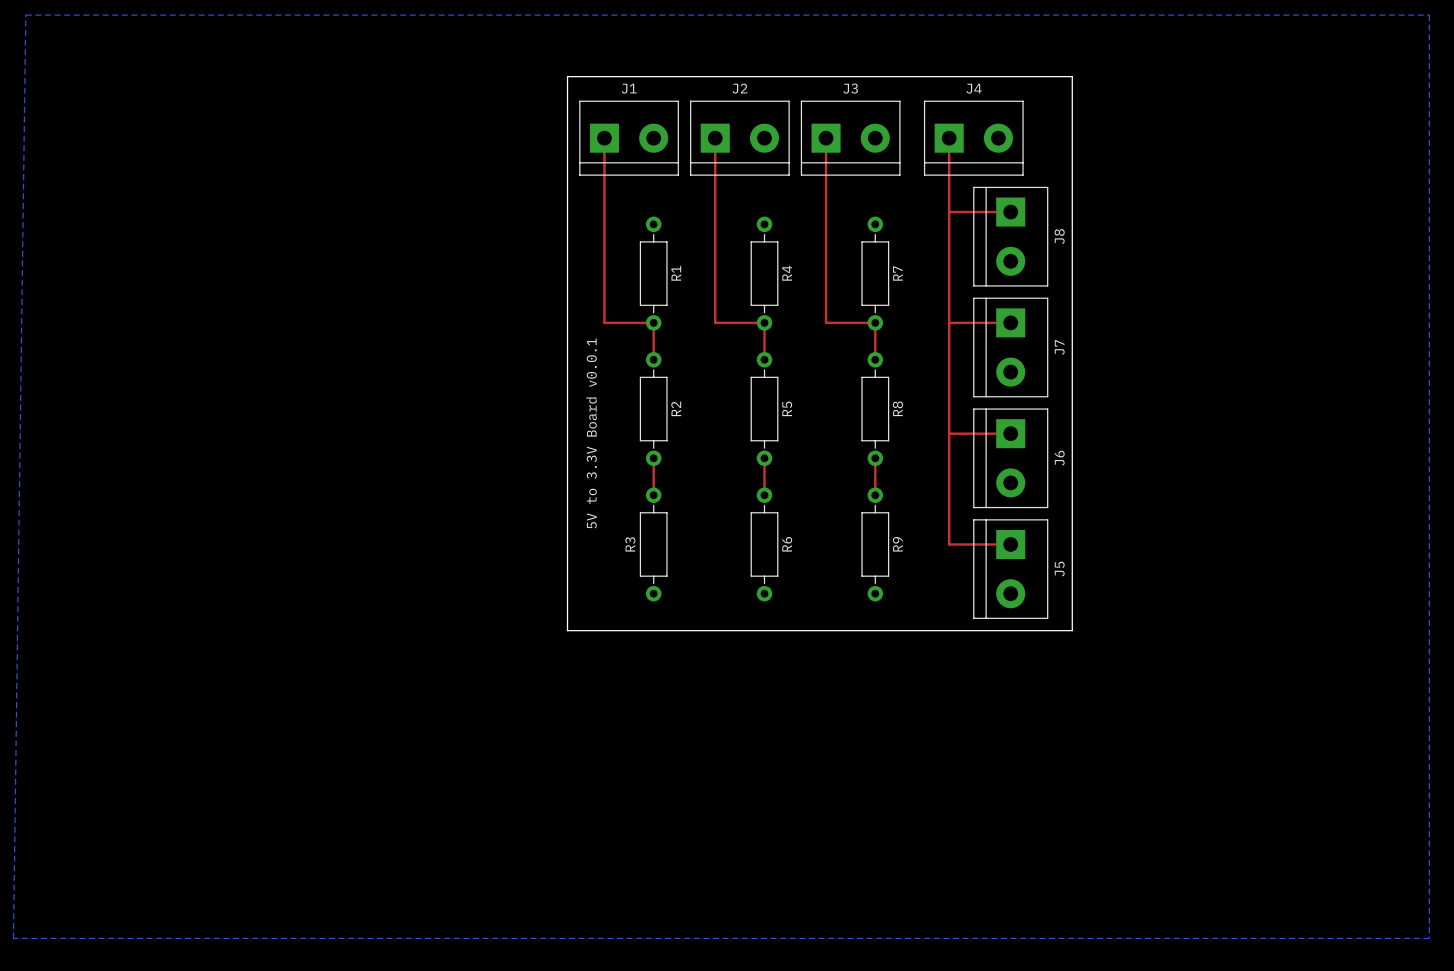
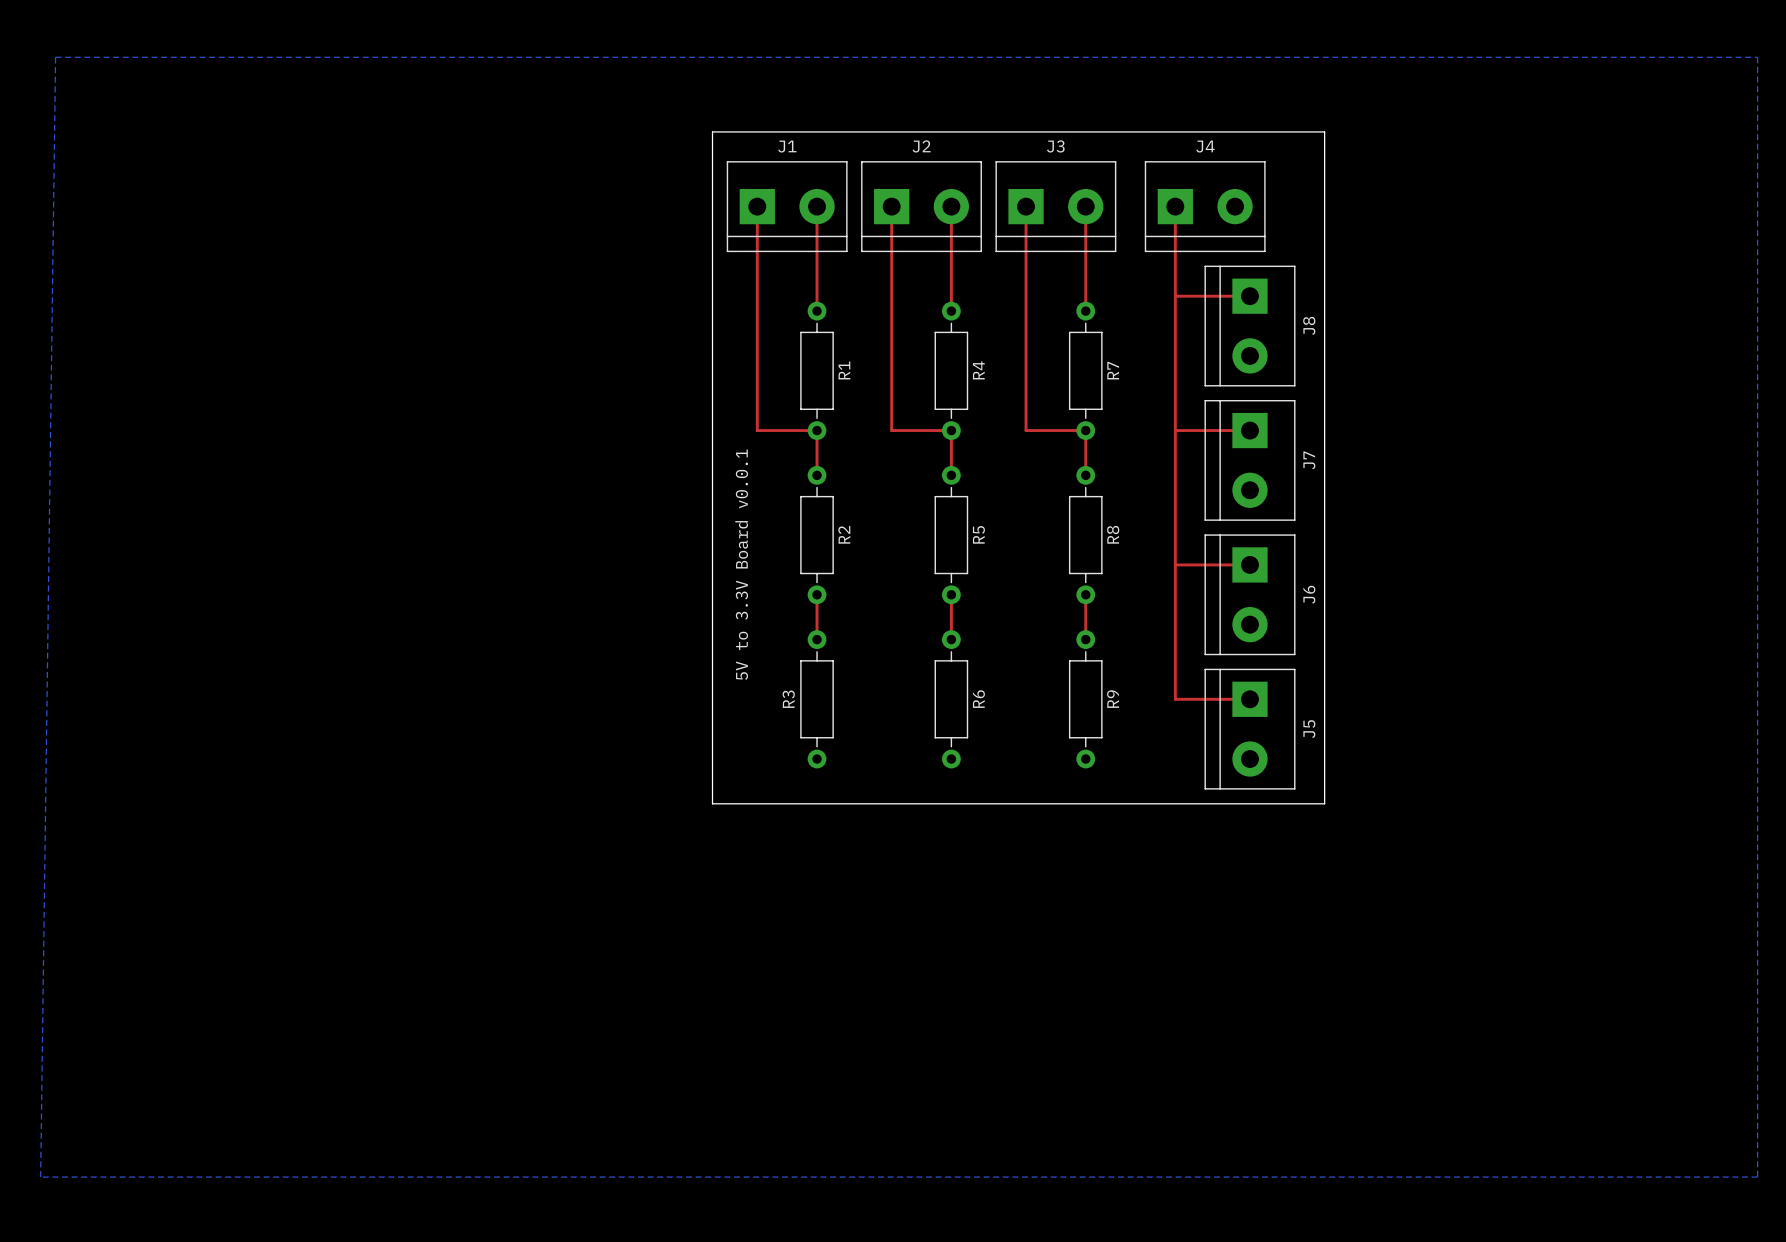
top track: none -> (817, 206) (817, 311)
top track: none -> (951, 206) (951, 311)
top track: none -> (1085, 206) (1085, 311)

